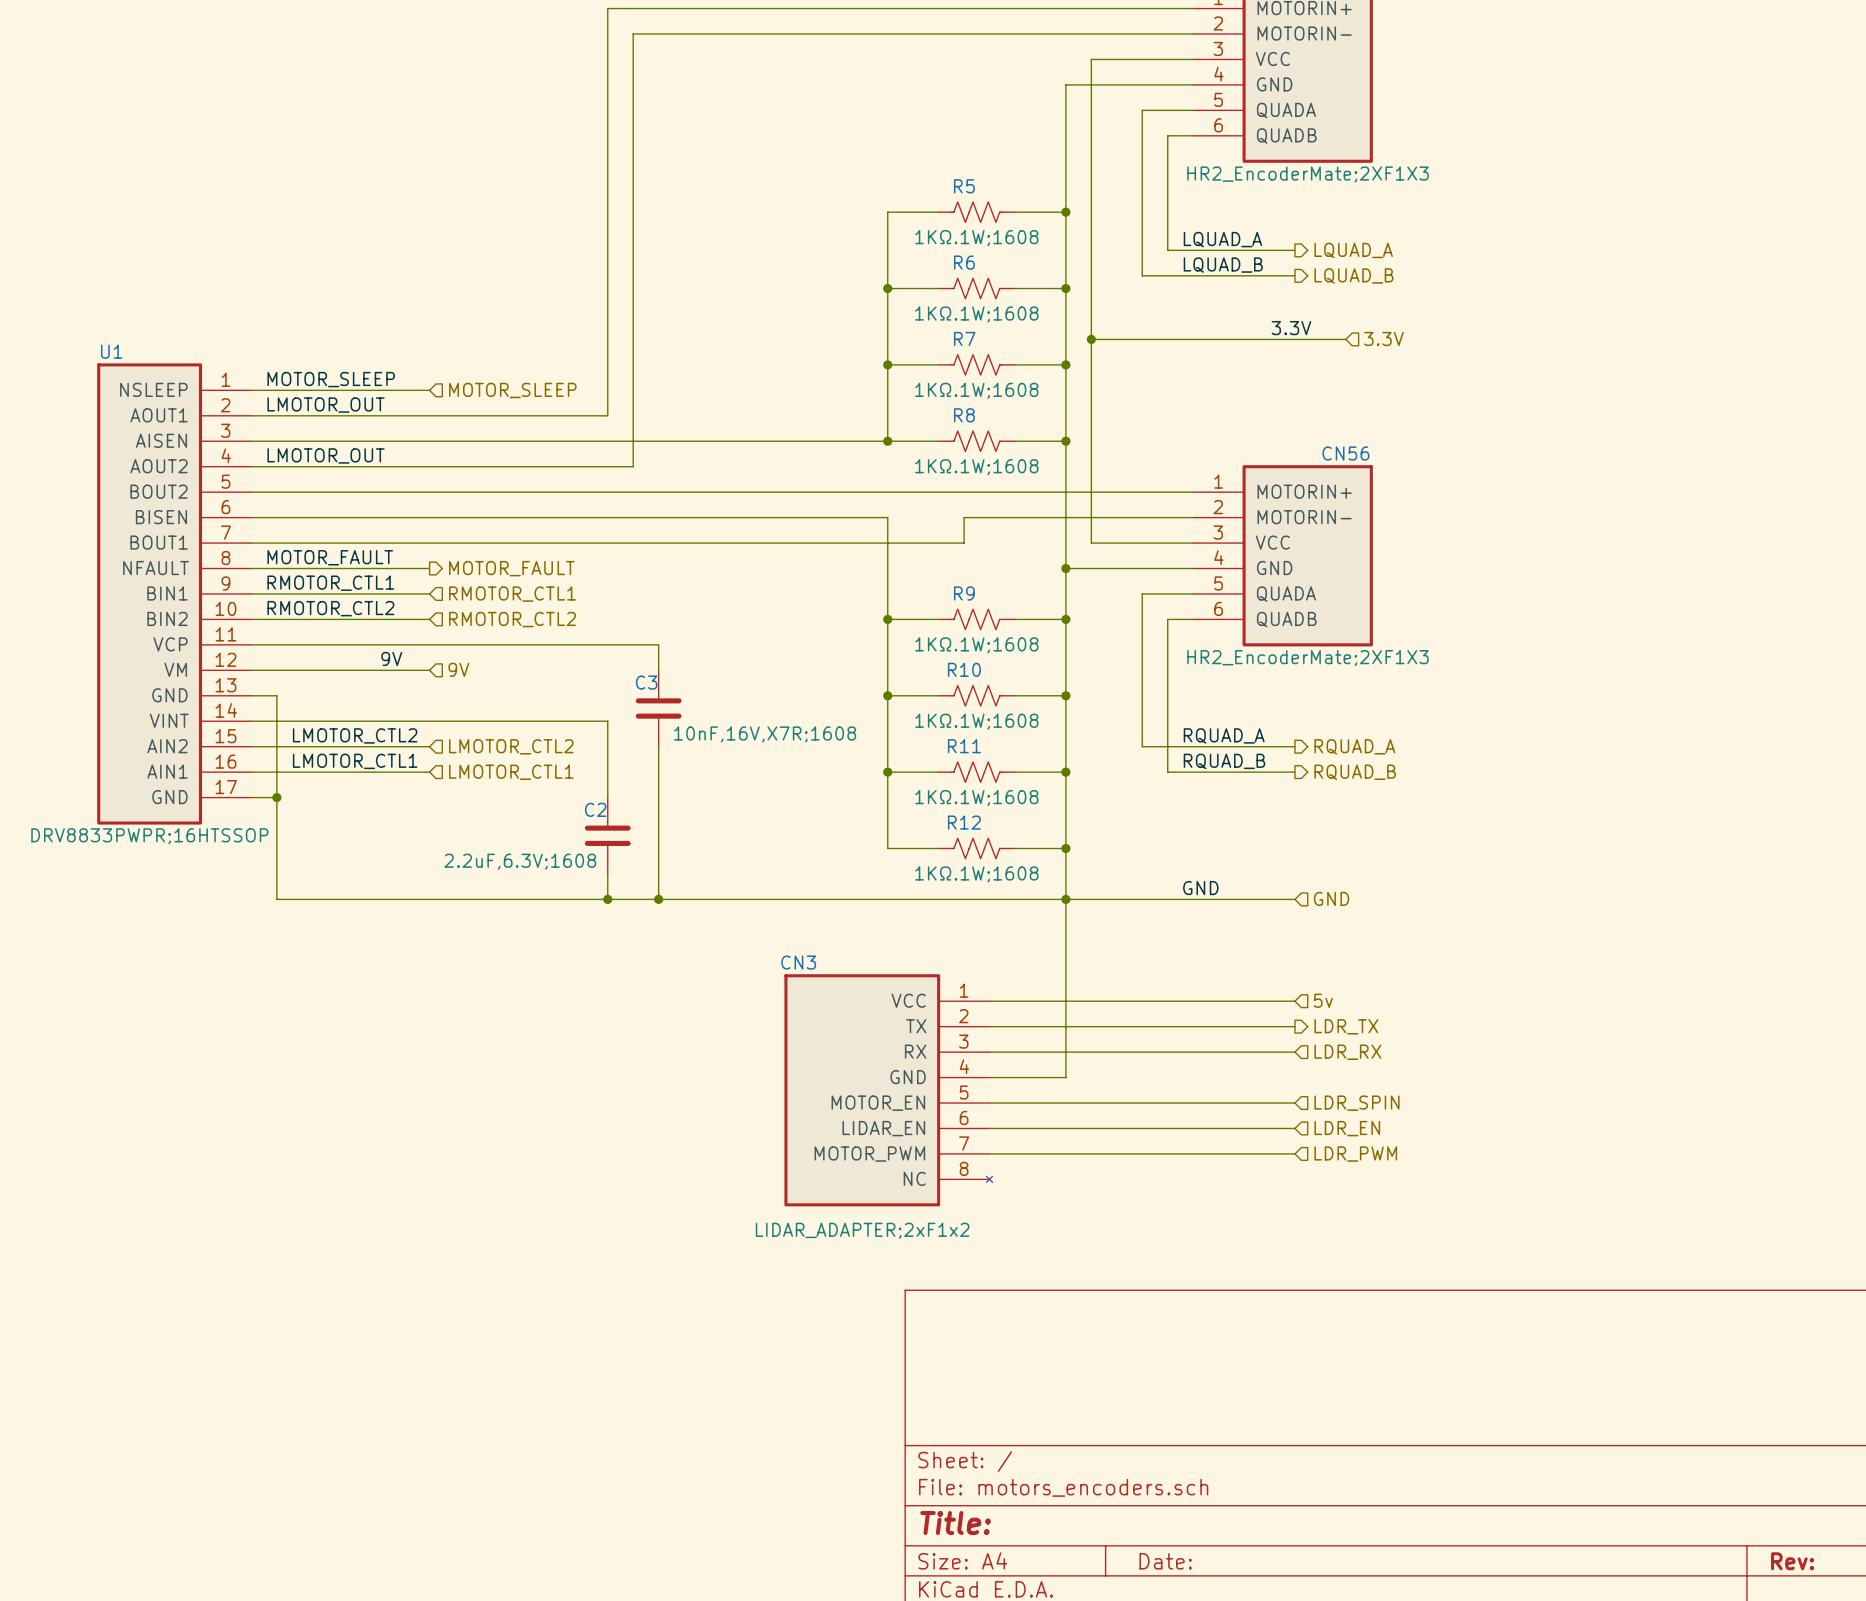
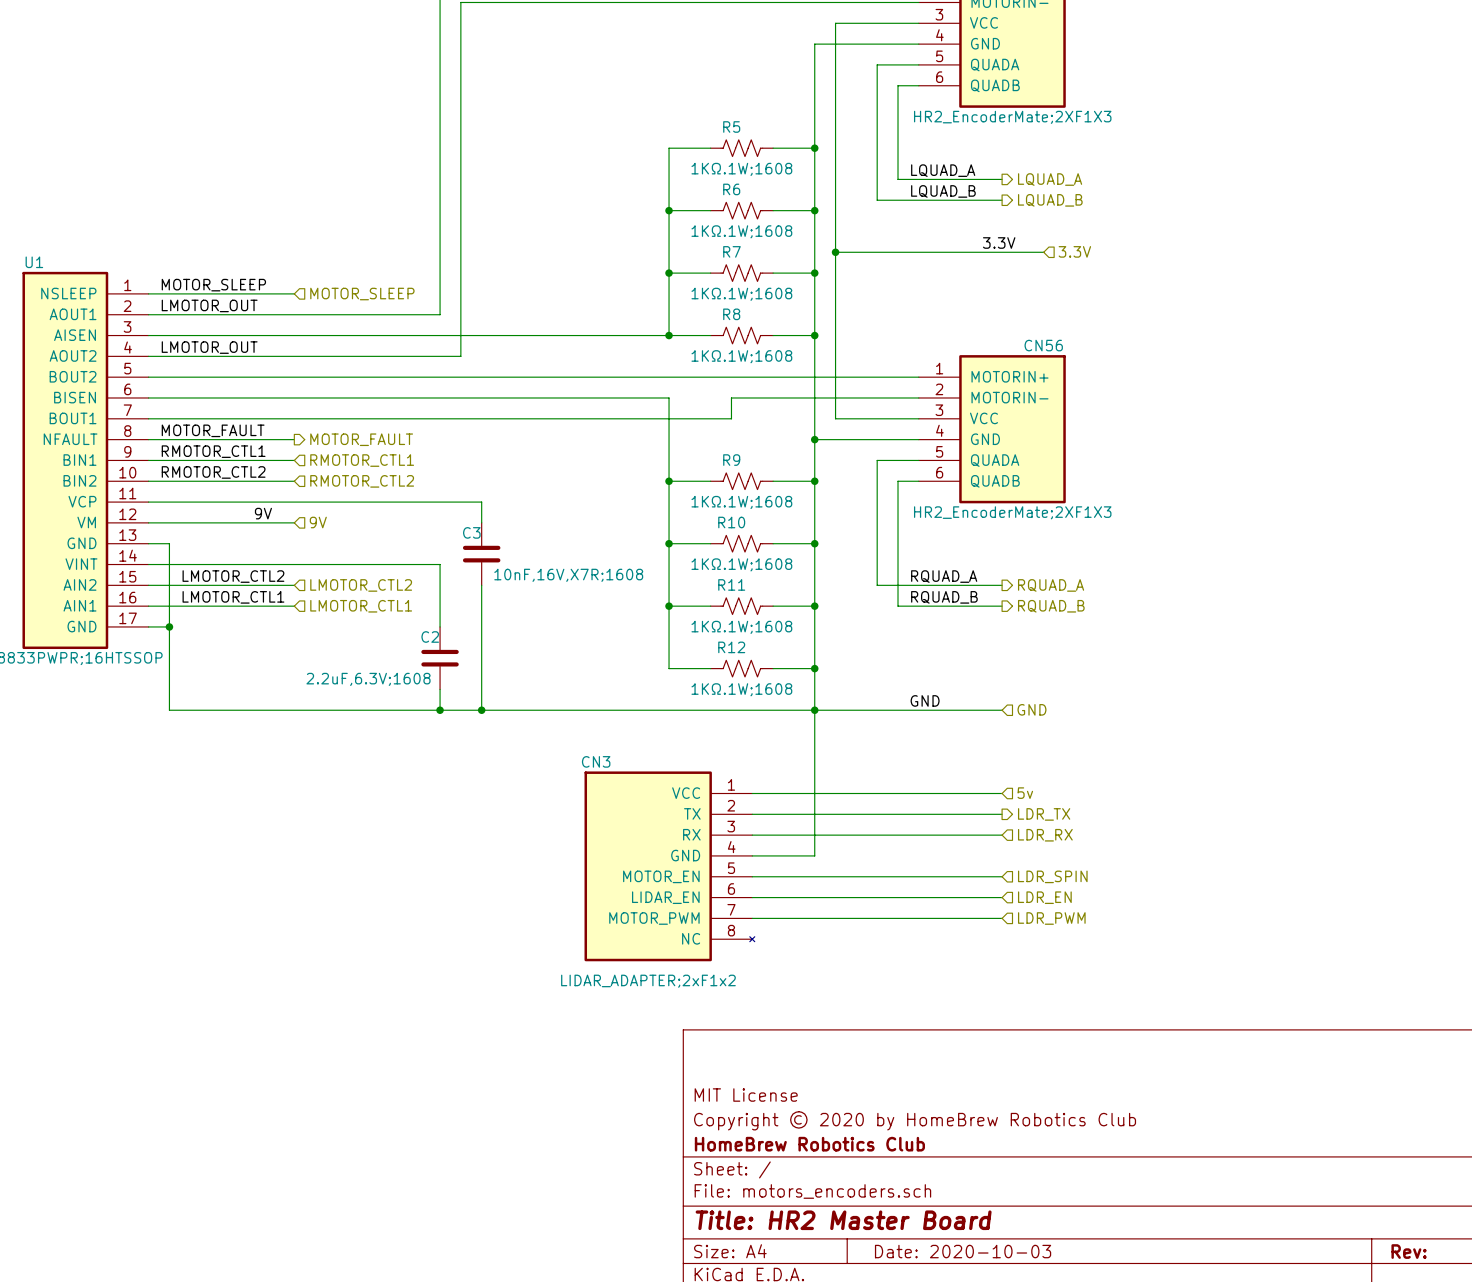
title block: none -> MIT License (746, 1095)
title block: none -> Copyright © 2020 by HomeBrew Robotics Club (915, 1120)
title block: none -> HomeBrew Robotics Club (809, 1144)
title block: Title: (955, 1523) -> Title: HR2 Master Board (843, 1220)
title block: Date: (1165, 1561) -> Date: 2020-10-03 (963, 1251)

